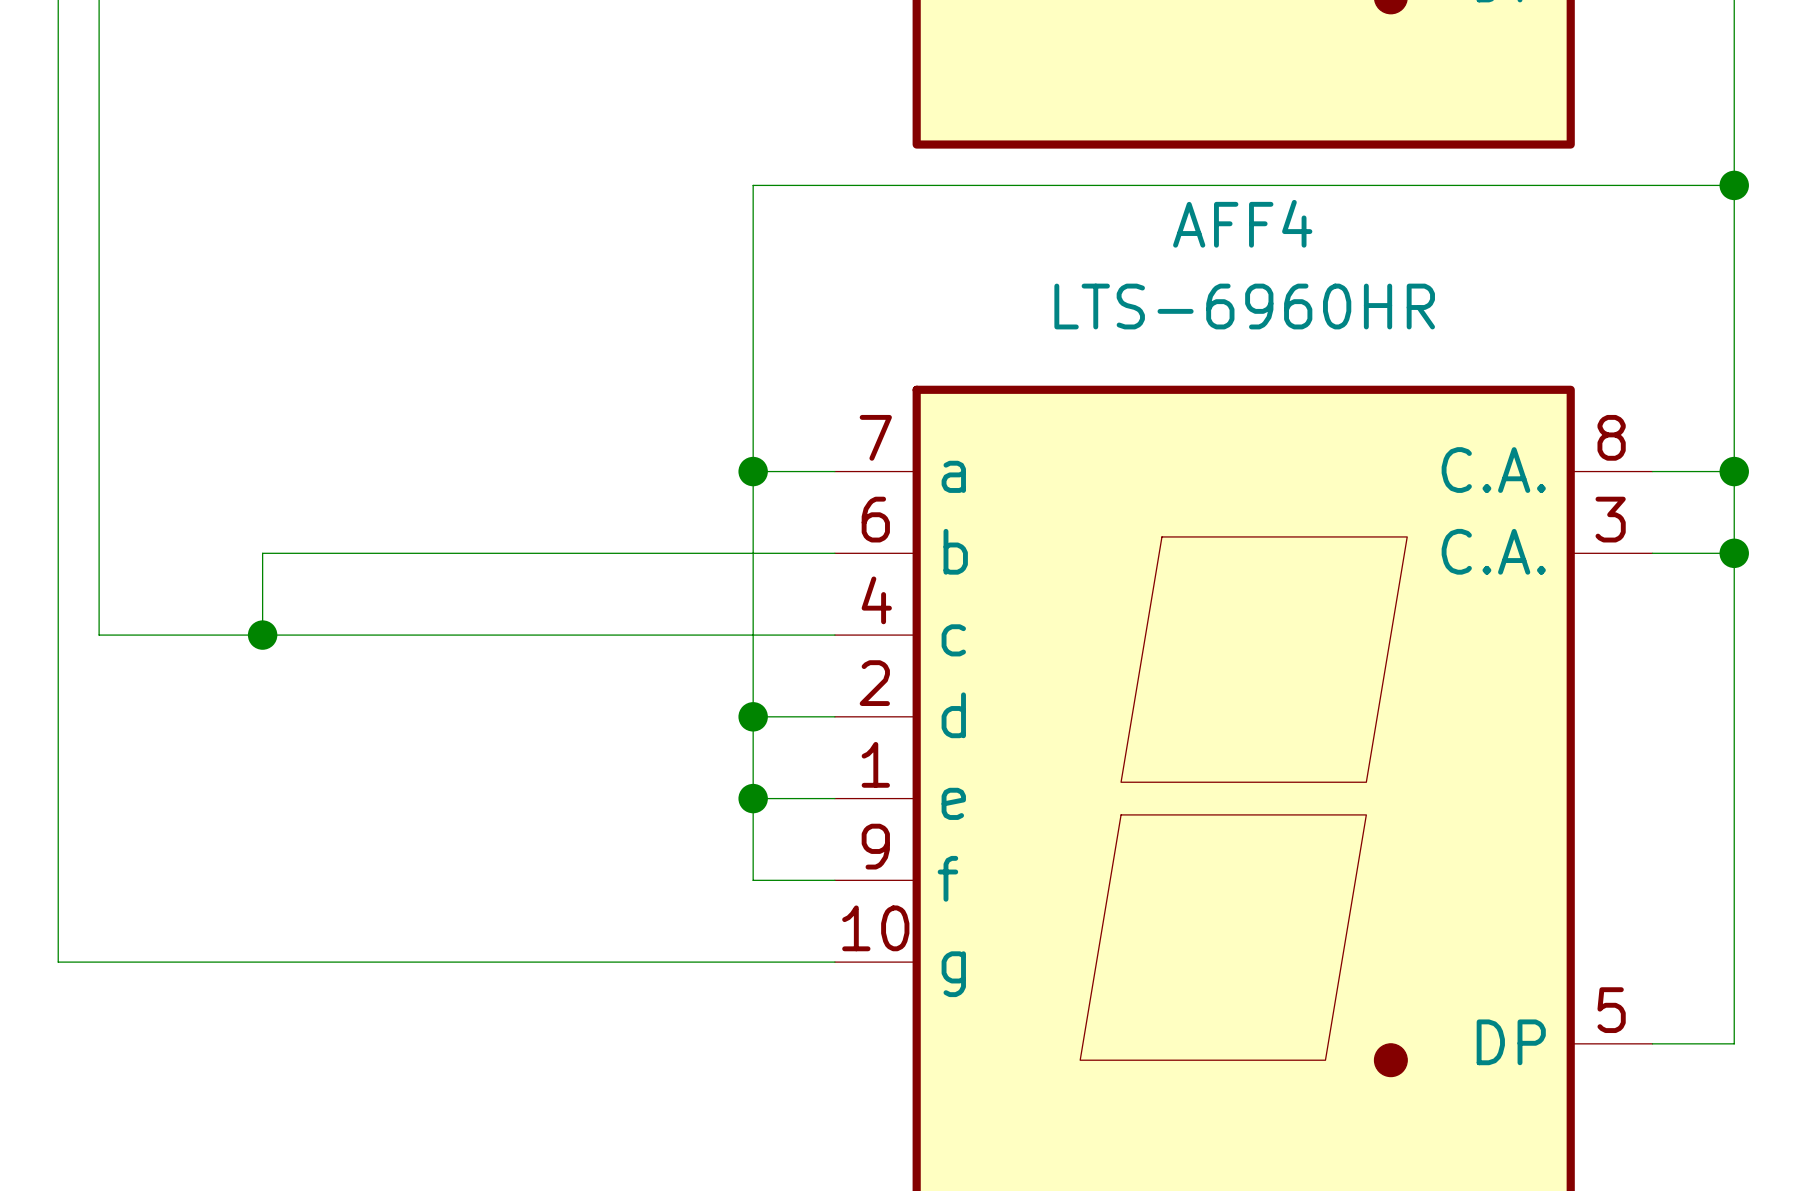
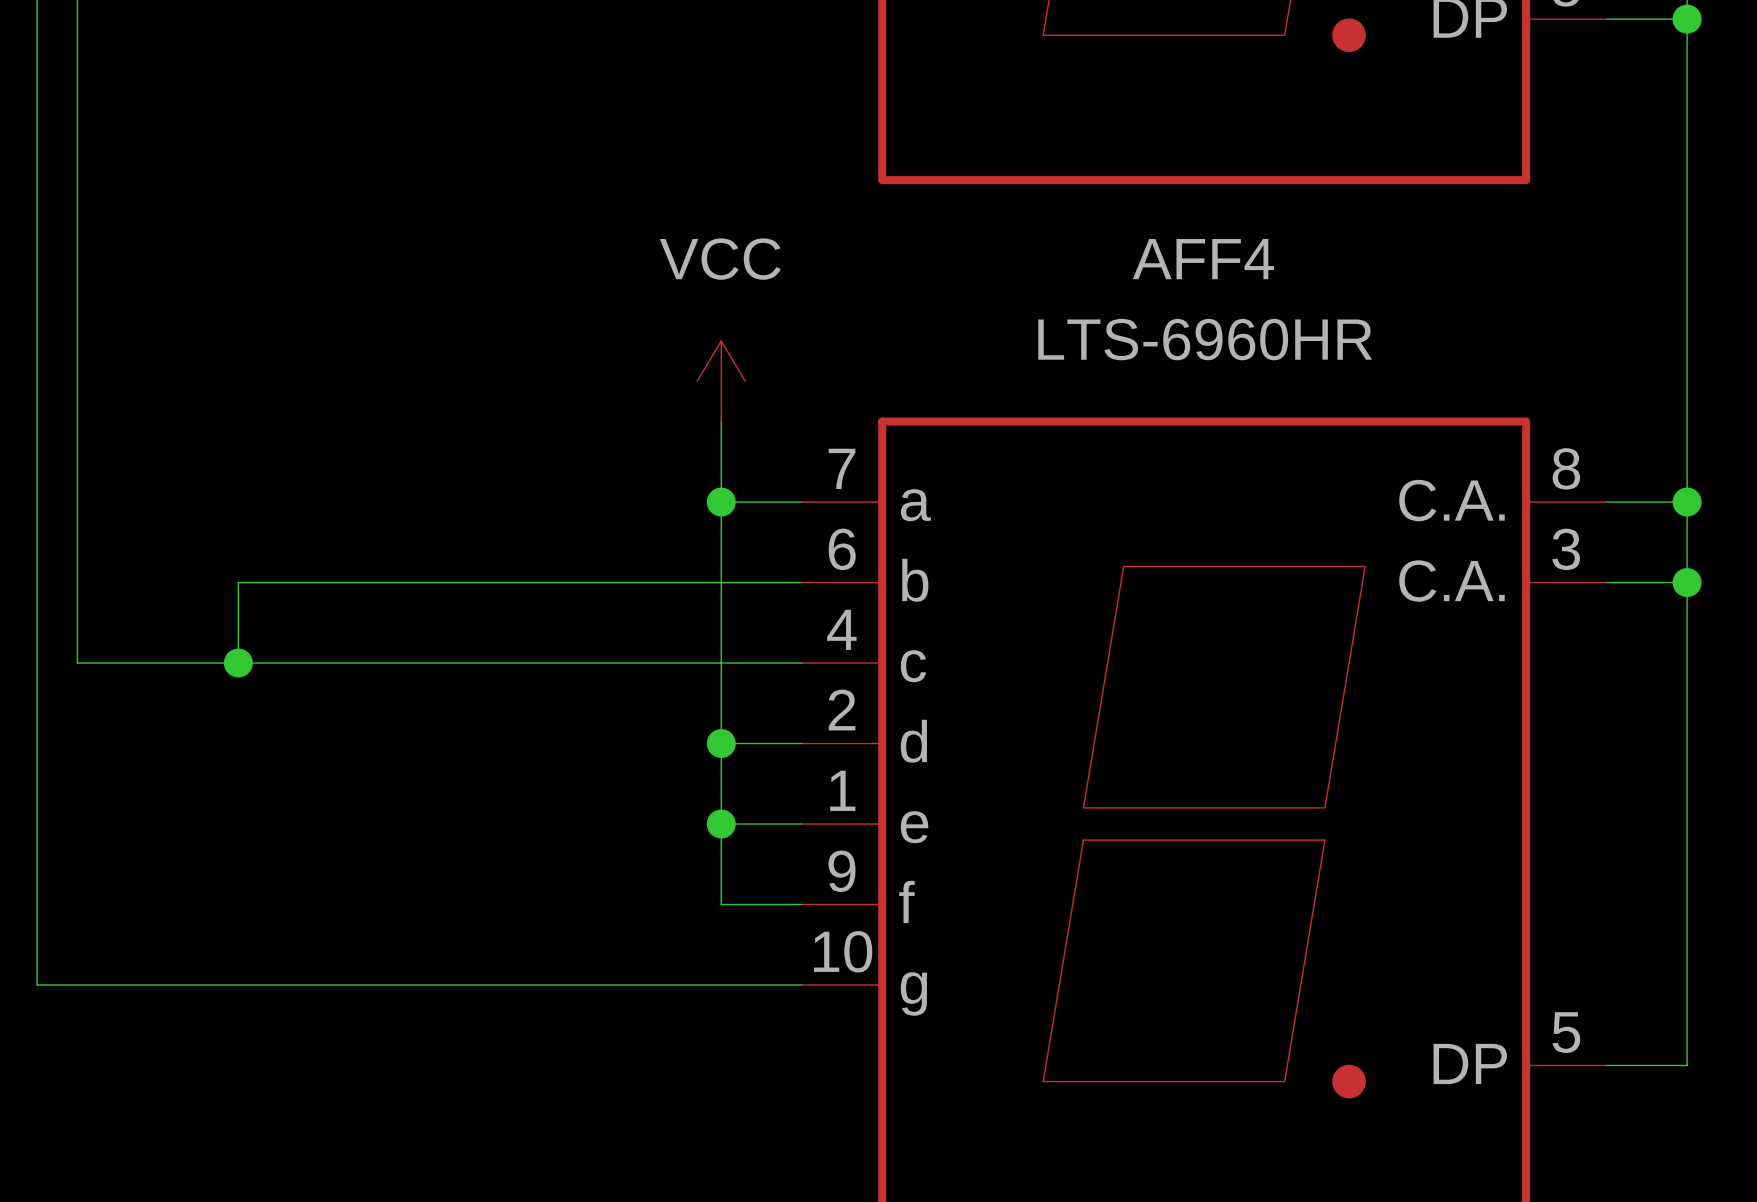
wire: (1734, 185) (753, 185) (753, 389) -> none
junction: (1734, 185) -> none
power symbol: none -> VCC (721, 381)

